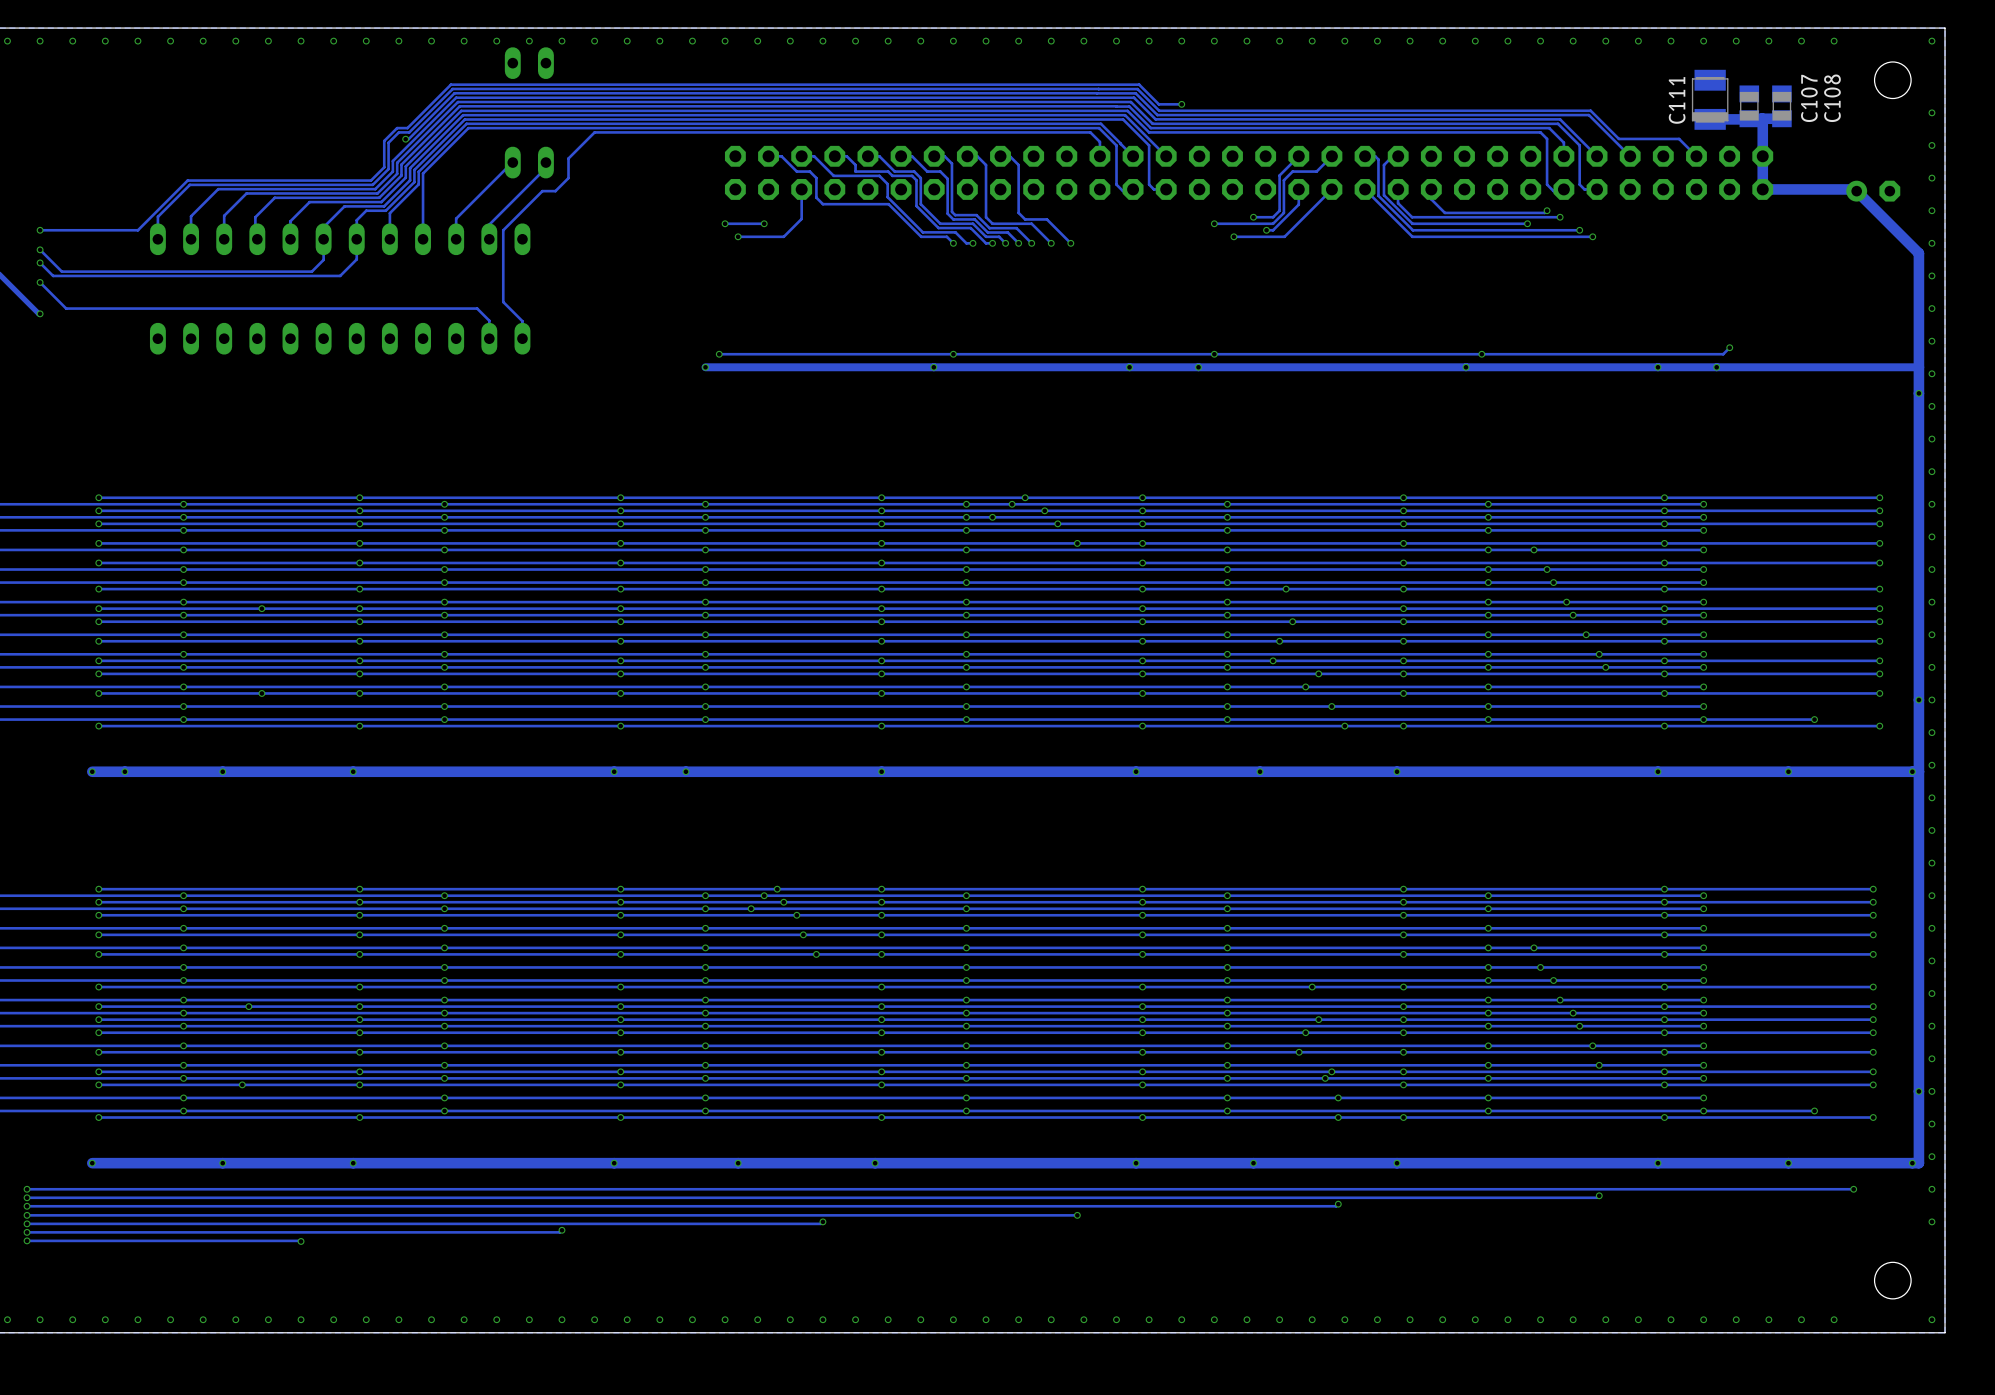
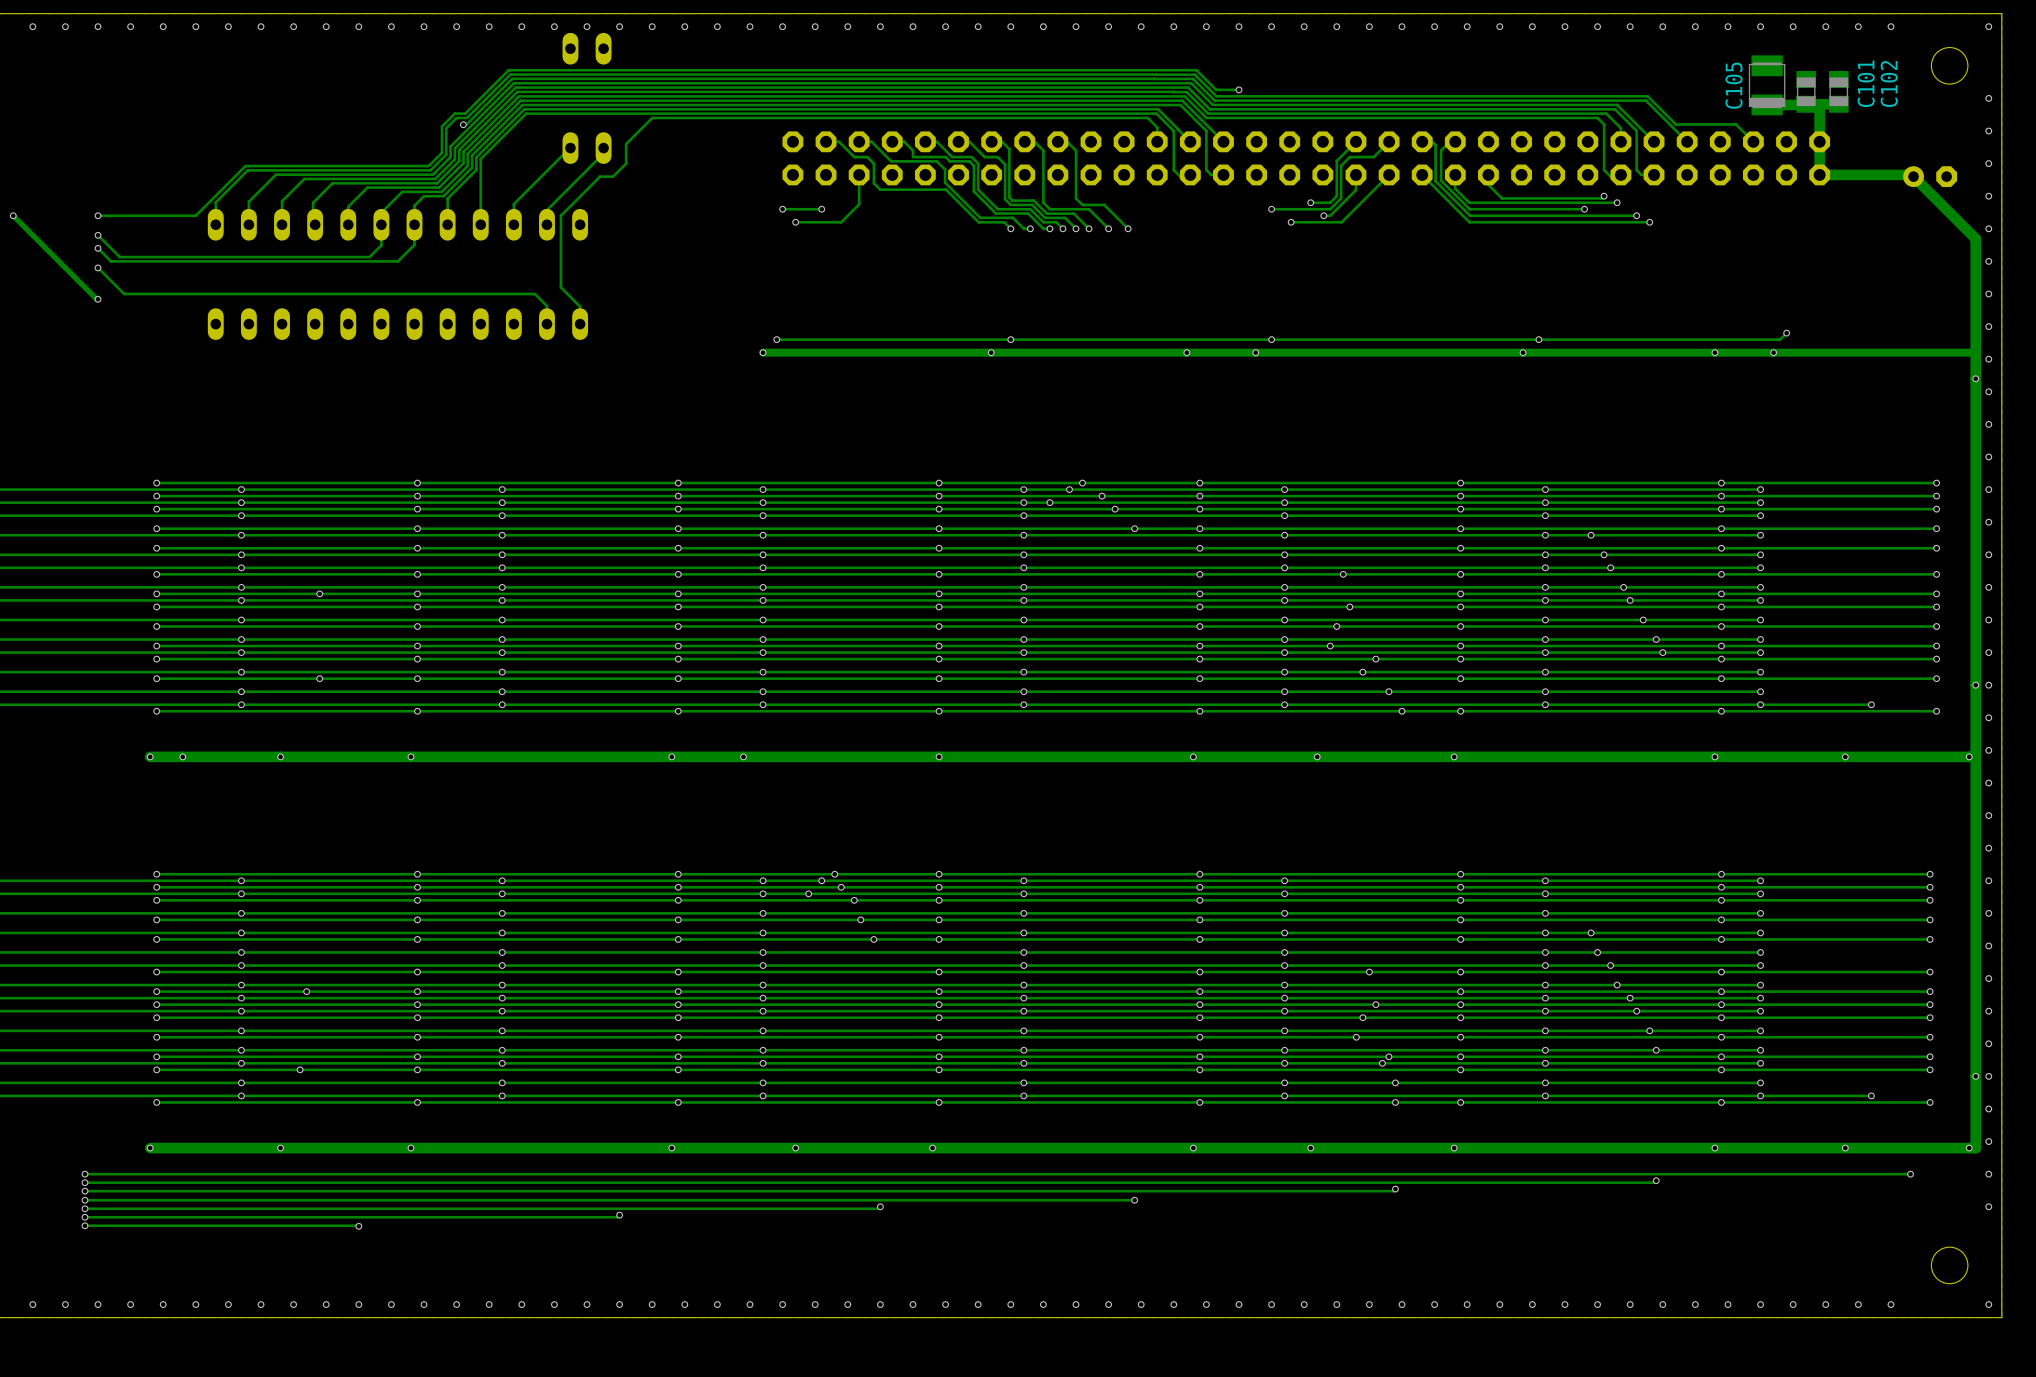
C107 name: C107 (1809, 98) -> C101 (1866, 83)
C108 name: C108 (1832, 98) -> C102 (1889, 83)
C111 name: C111 (1677, 100) -> C105 (1733, 85)

